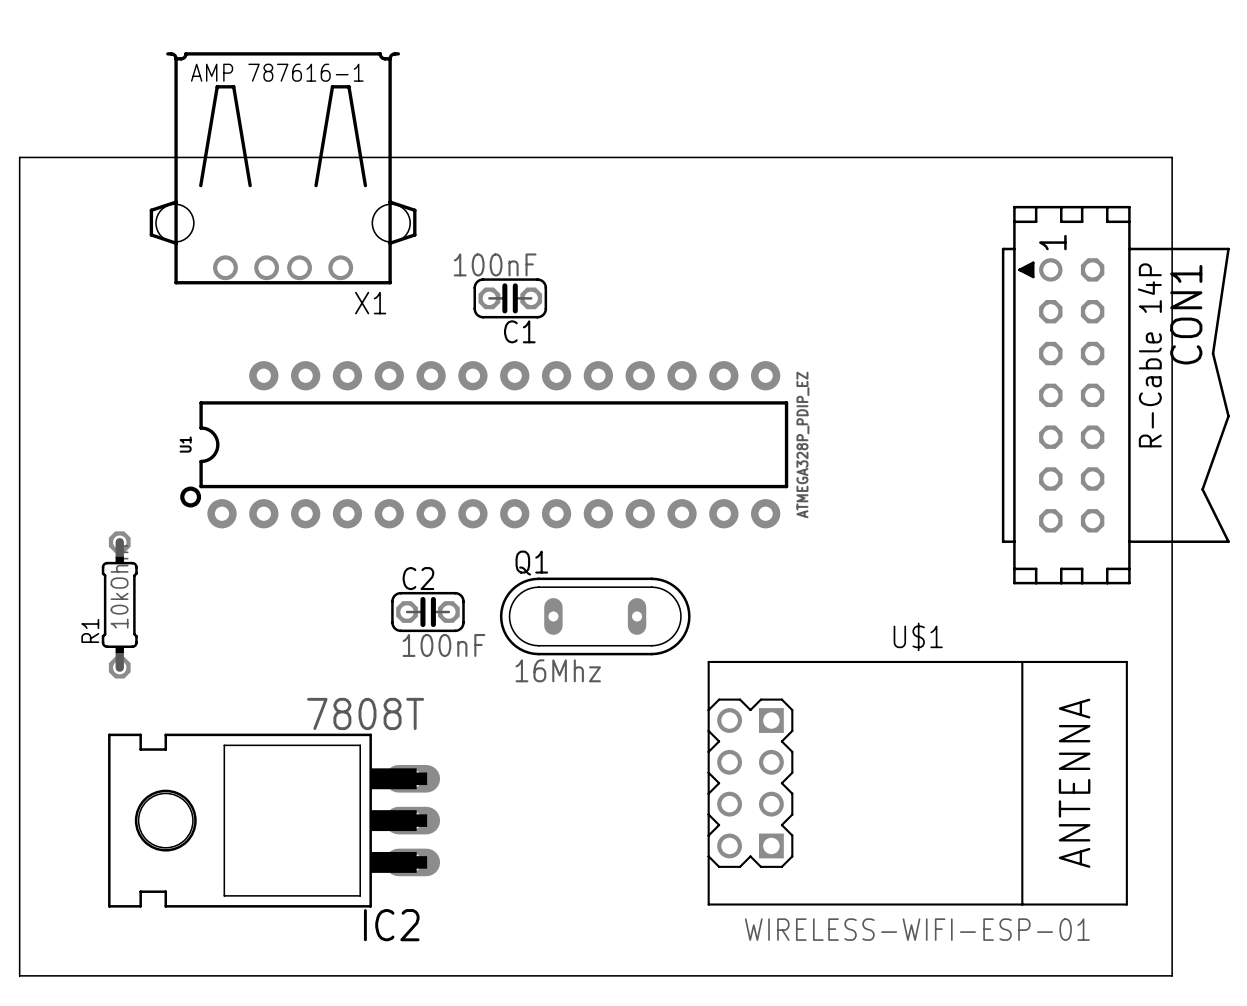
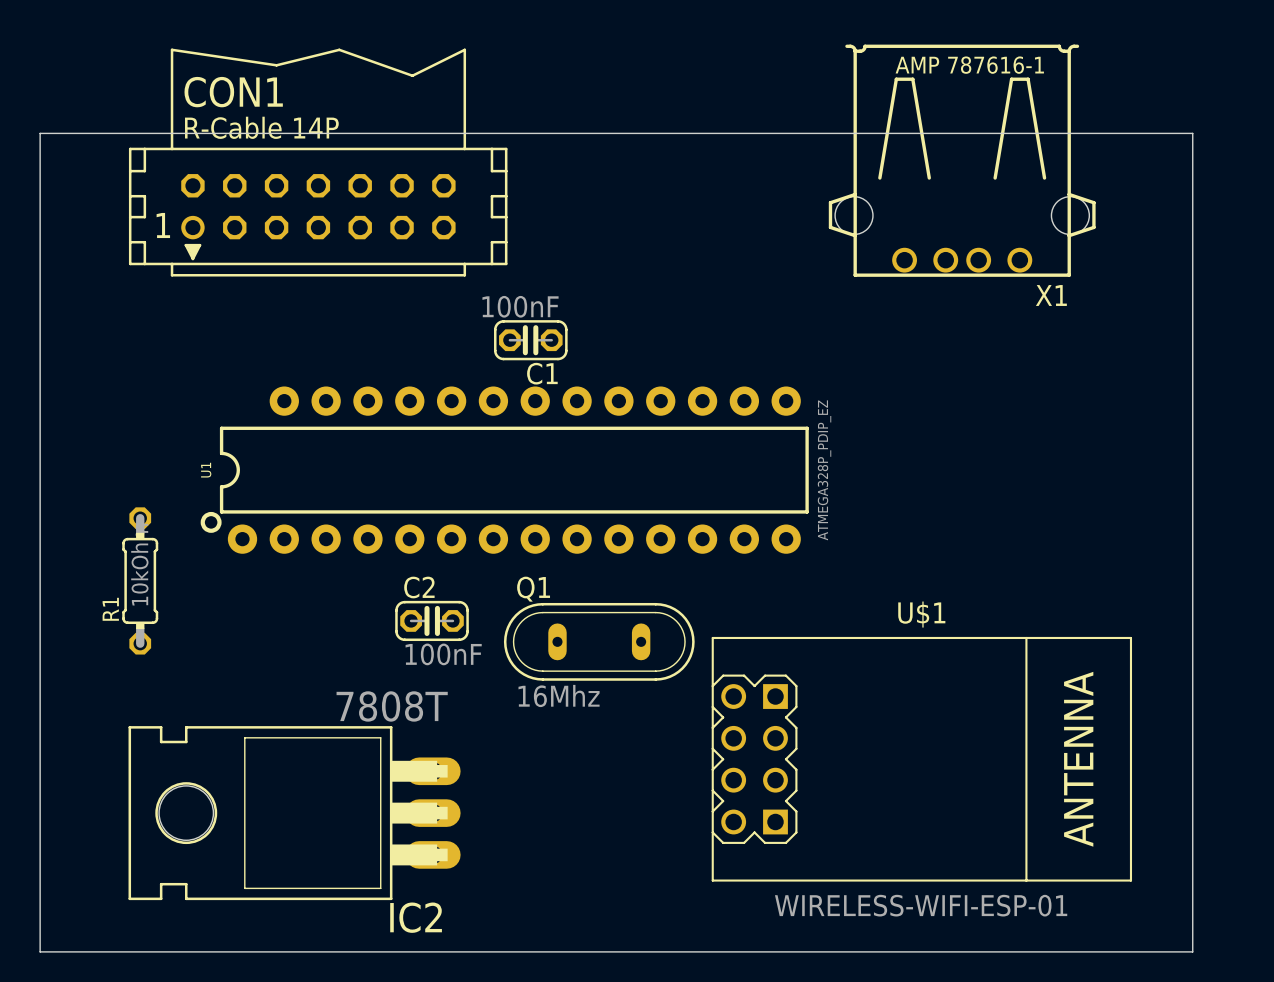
X1 position: (283, 168) -> (962, 160)
CON1 footprint: [1001, 205, 1230, 585] -> [128, 48, 508, 277]
C1 position: (510, 298) -> (530, 340)
CON1 name position: CON1 (1186, 314) -> CON1 (233, 92)
U1 position: (484, 444) -> (504, 470)
C2 position: (427, 612) -> (432, 620)
Q1 position: (595, 616) -> (599, 641)
U$1 position: (917, 783) -> (921, 759)
IC2 position: (274, 820) -> (294, 813)

